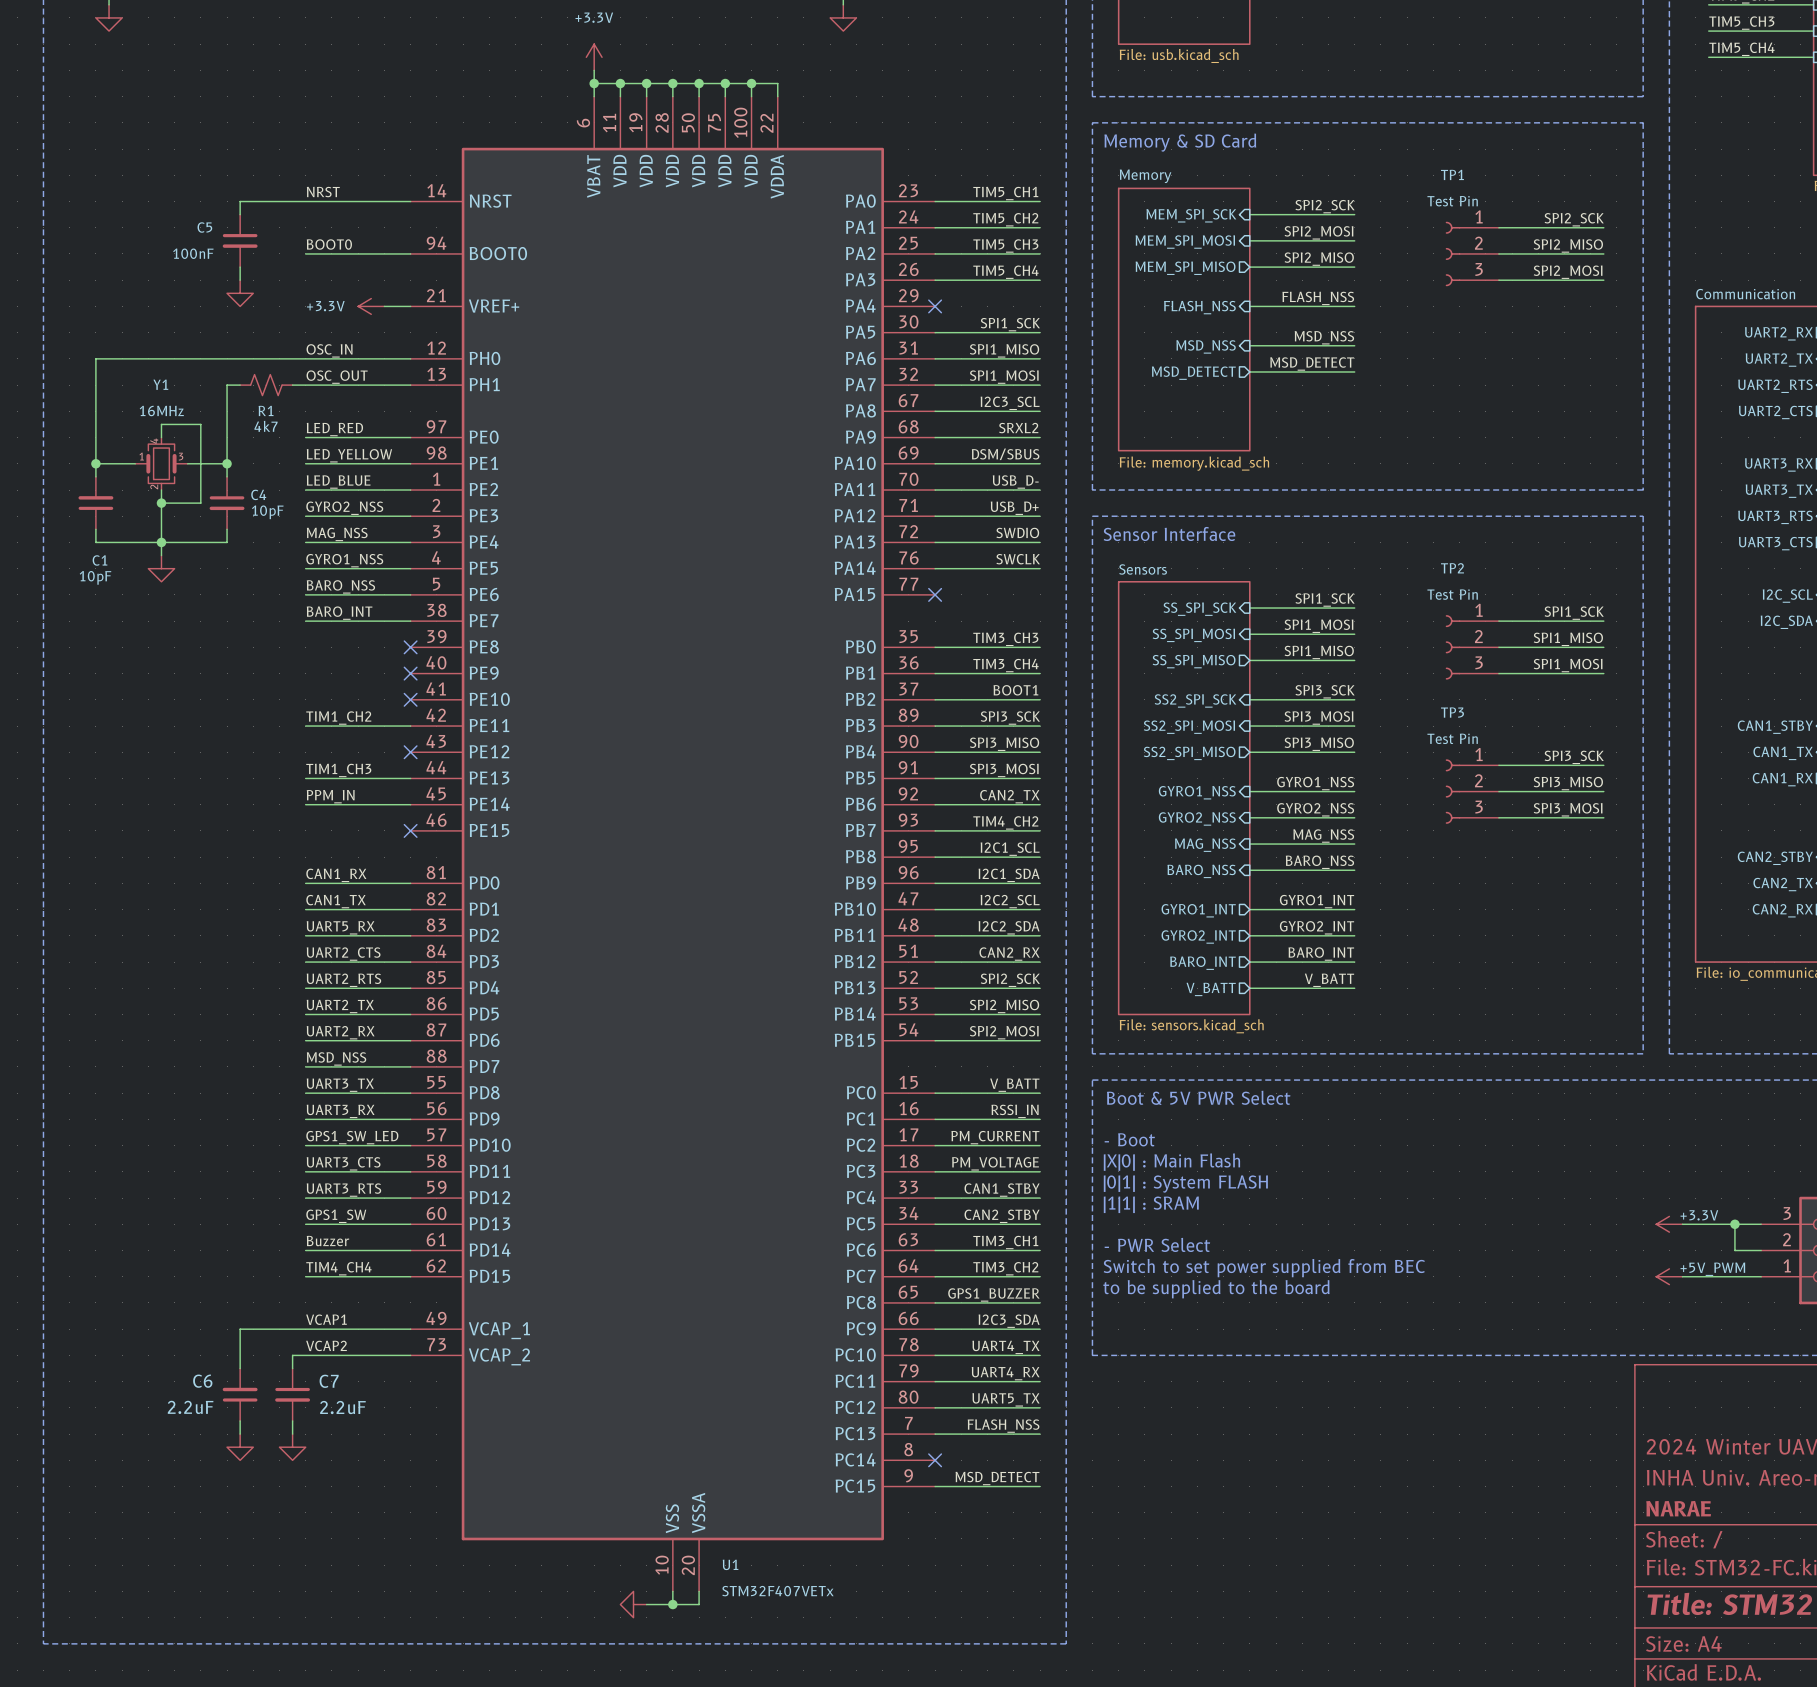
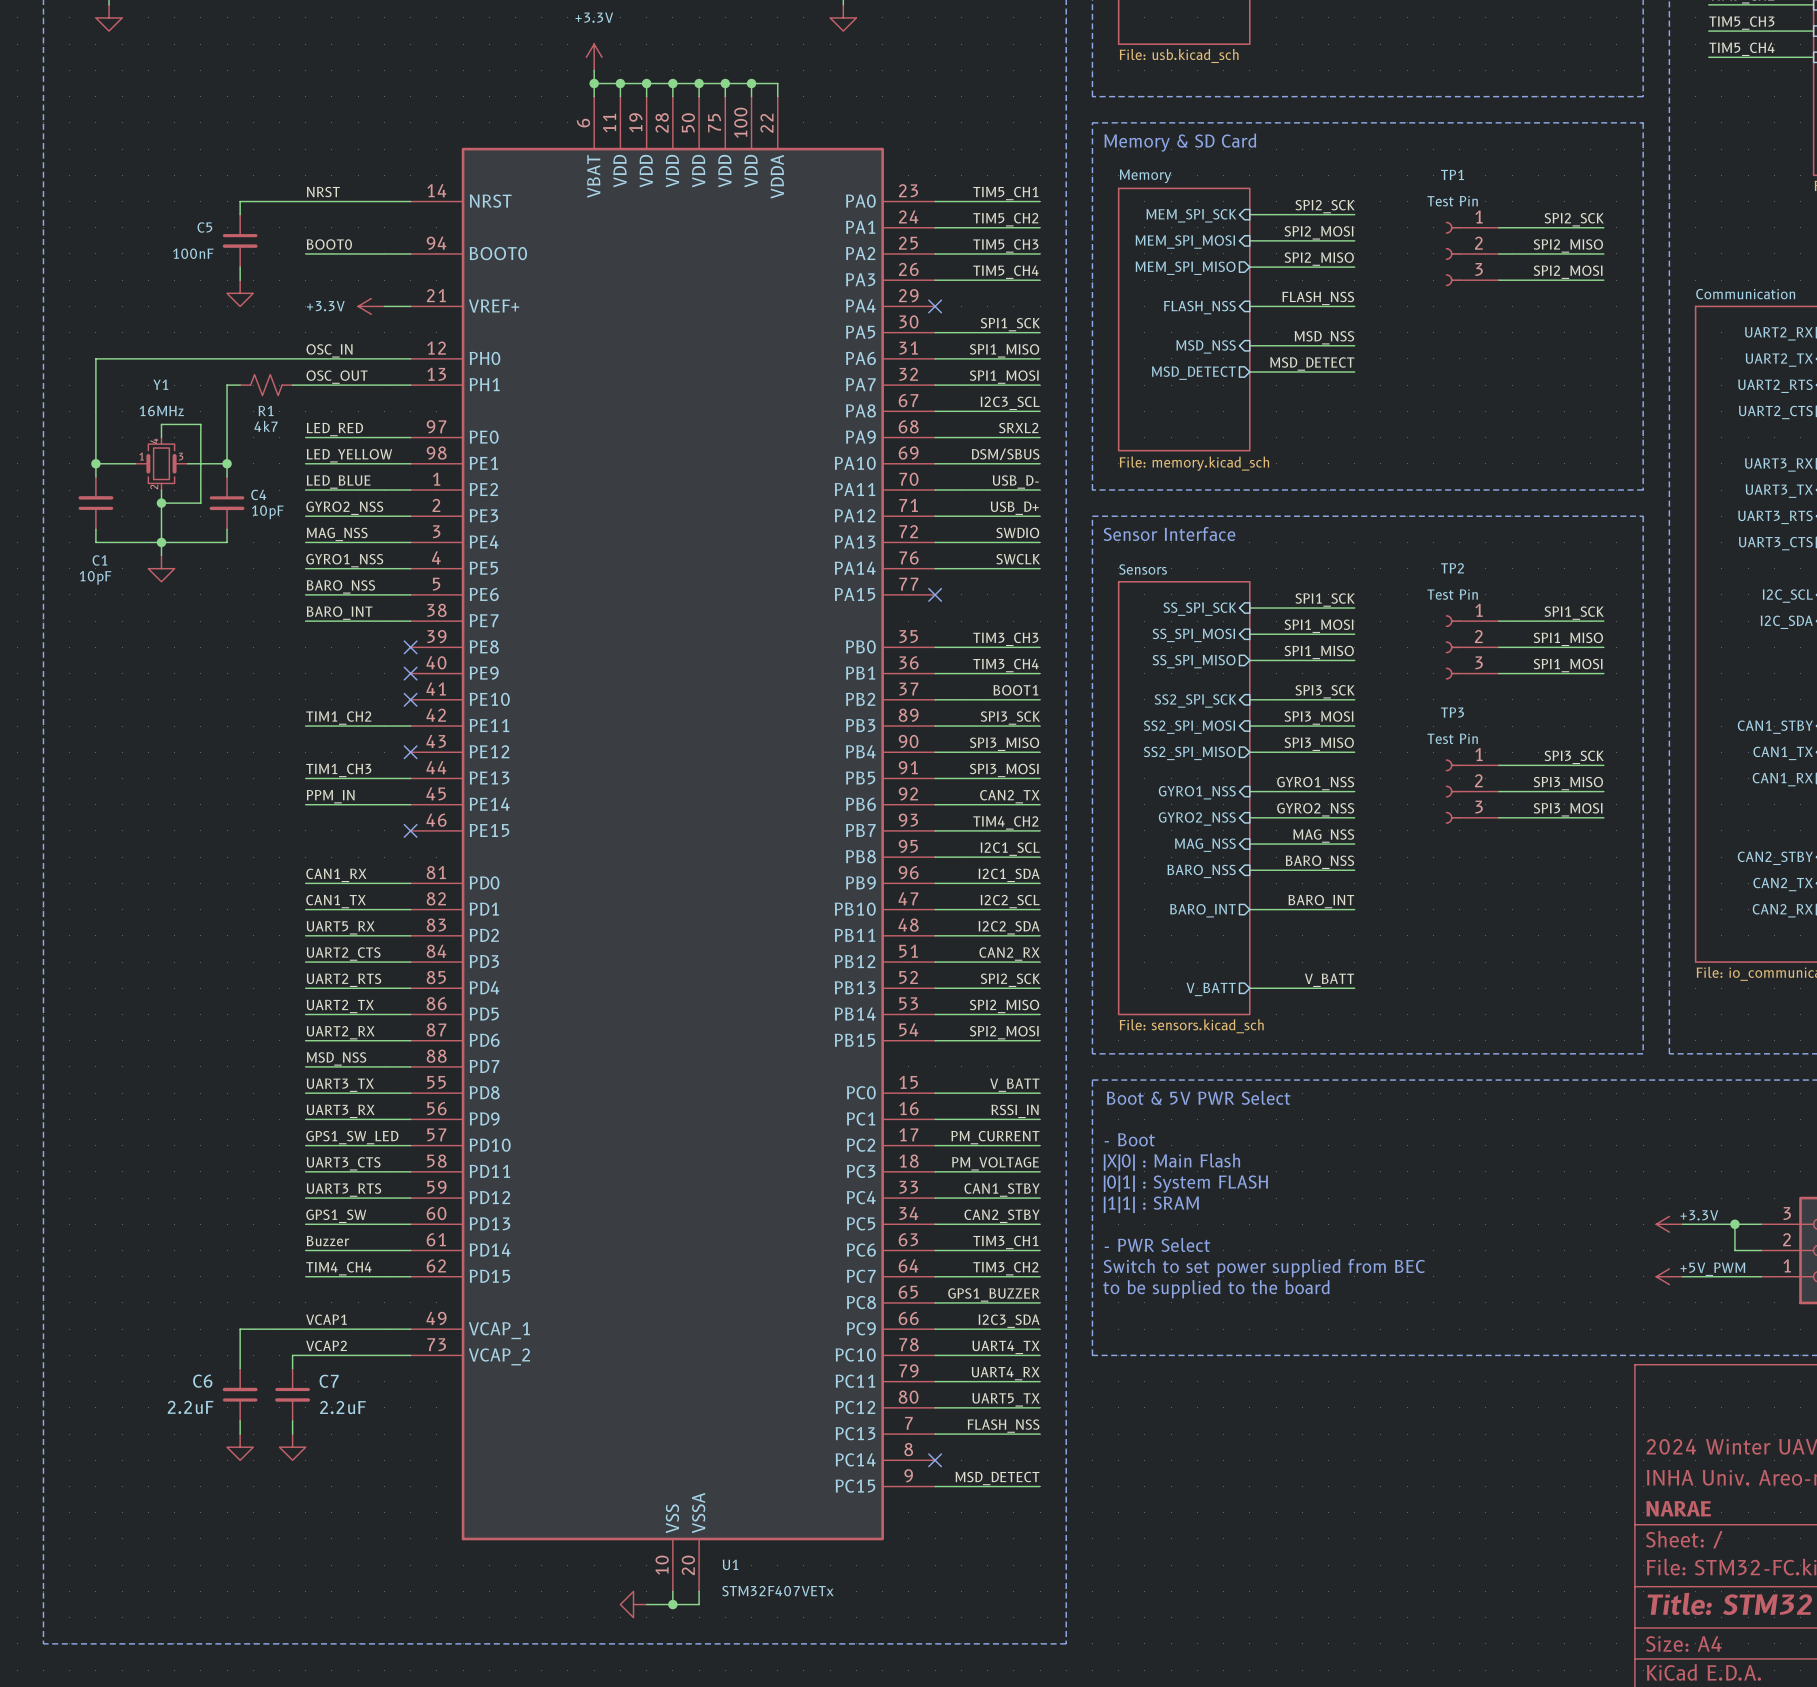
label: GYRO1_INT (1317, 901) -> BARO_INT (1321, 901)
sheet pin: GYRO1_INT (1198, 910) -> BARO_INT (1202, 910)
label: GYRO2_INT (1317, 927) -> none
wire: (1249, 935) (1354, 935) -> none
sheet pin: GYRO2_INT (1198, 936) -> none
label: BARO_INT (1321, 954) -> none
wire: (1249, 962) (1354, 962) -> none
sheet pin: BARO_INT (1202, 963) -> none

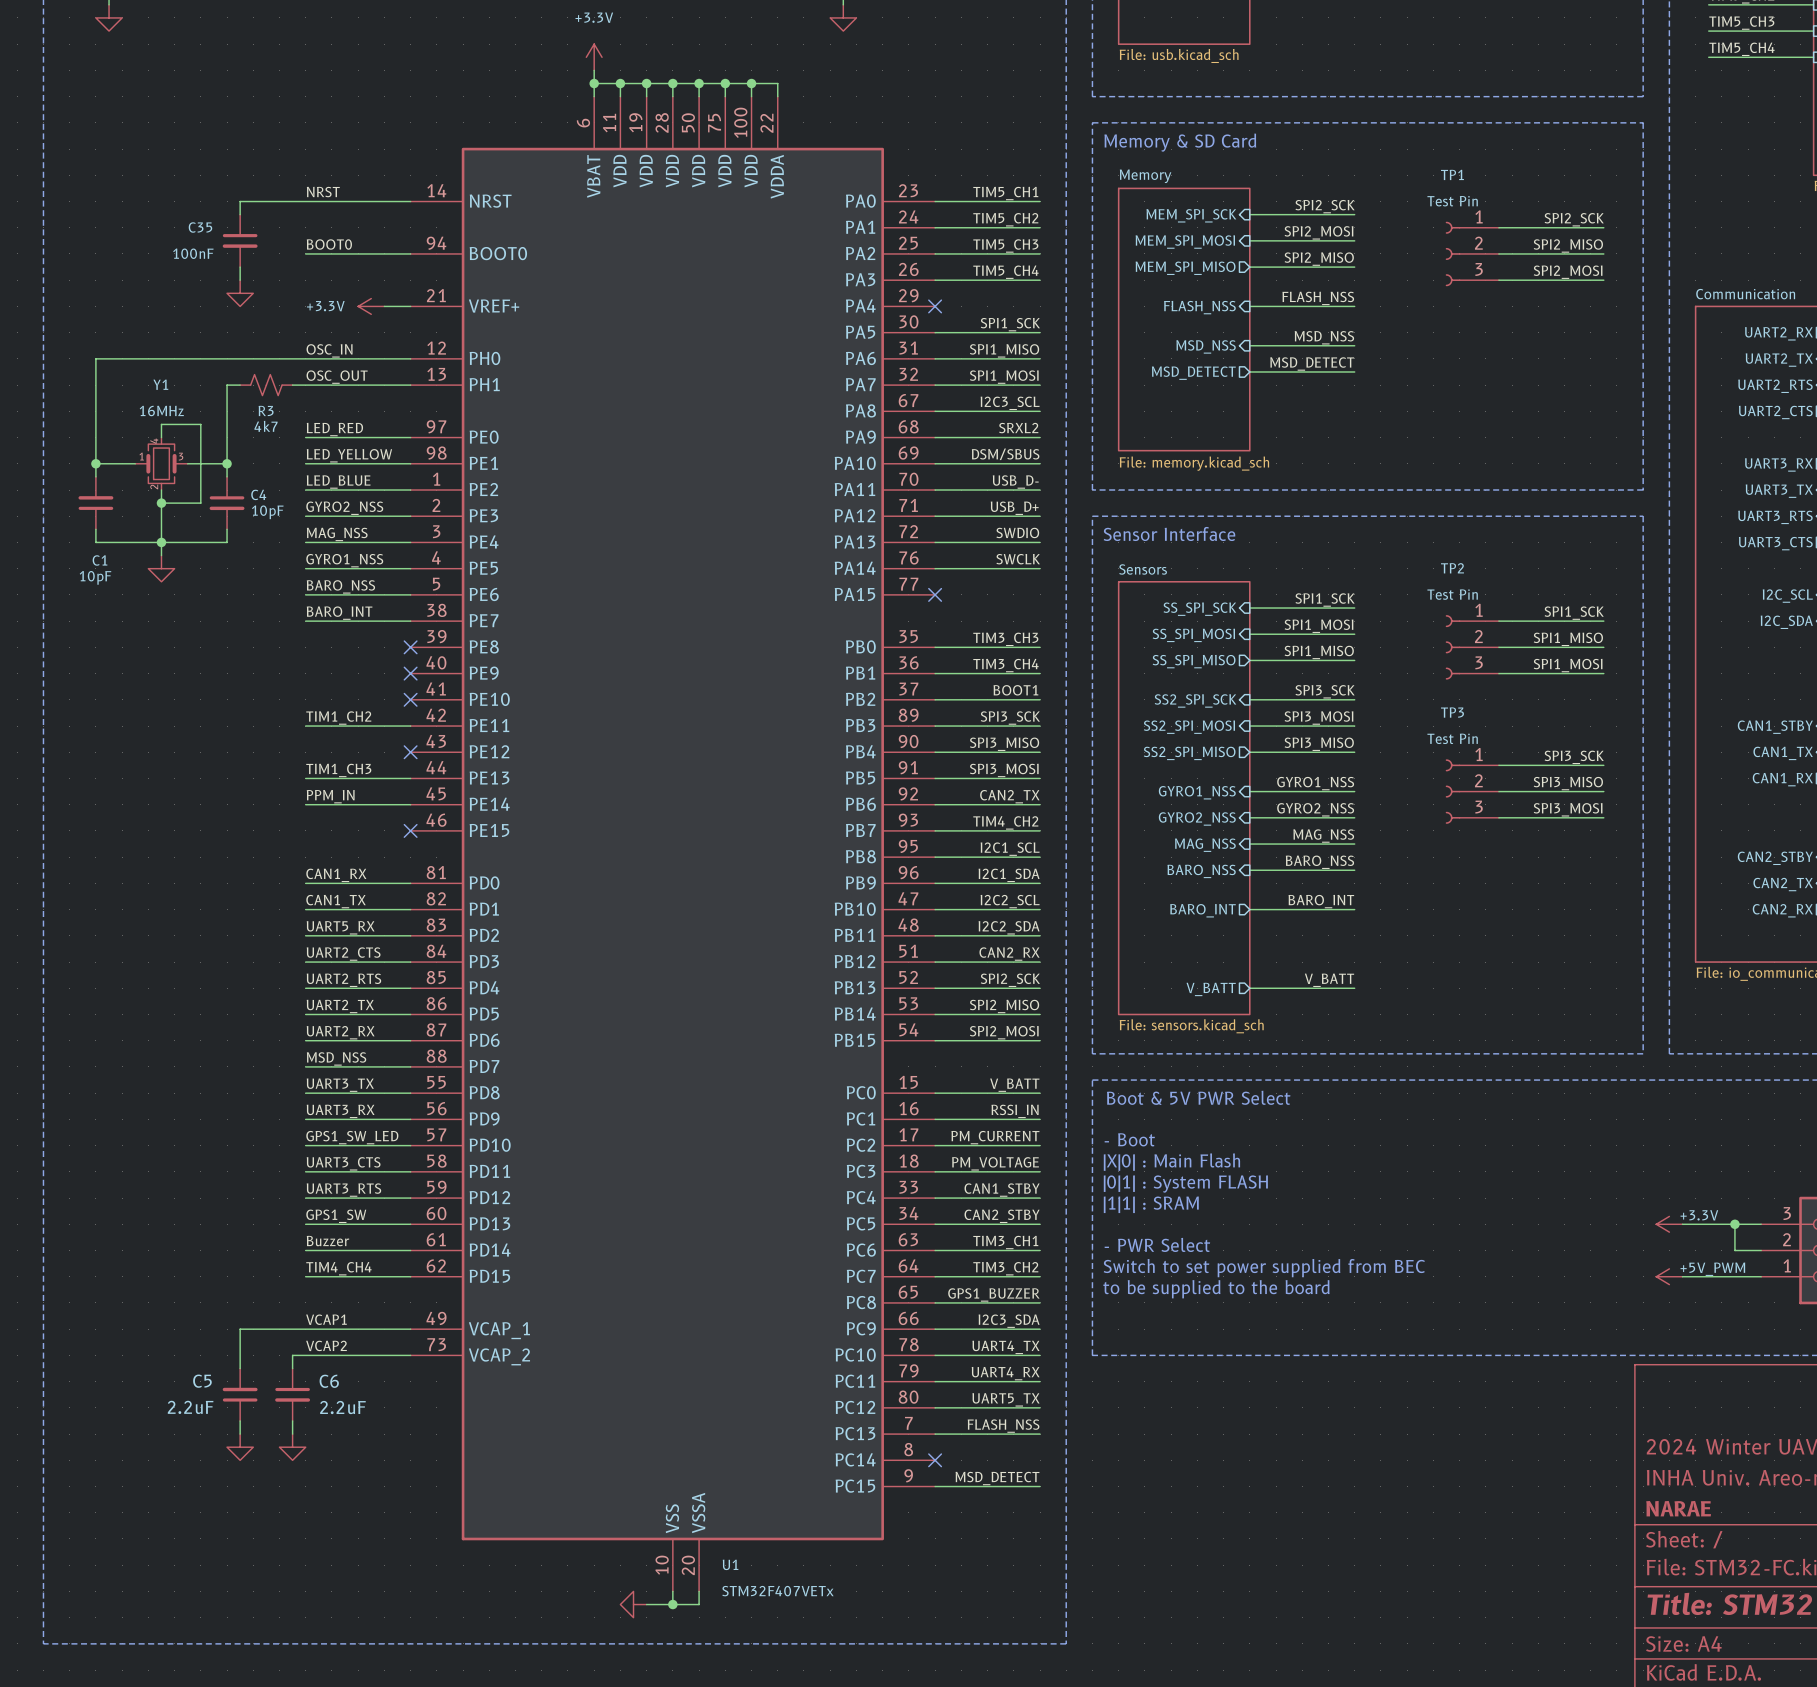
C5 name: C5 (204, 227) -> C35 (200, 227)
R1 name: R1 (266, 410) -> R3 (266, 410)
C6 name: C6 (202, 1381) -> C5 (202, 1381)
C7 name: C7 (329, 1381) -> C6 (329, 1381)

